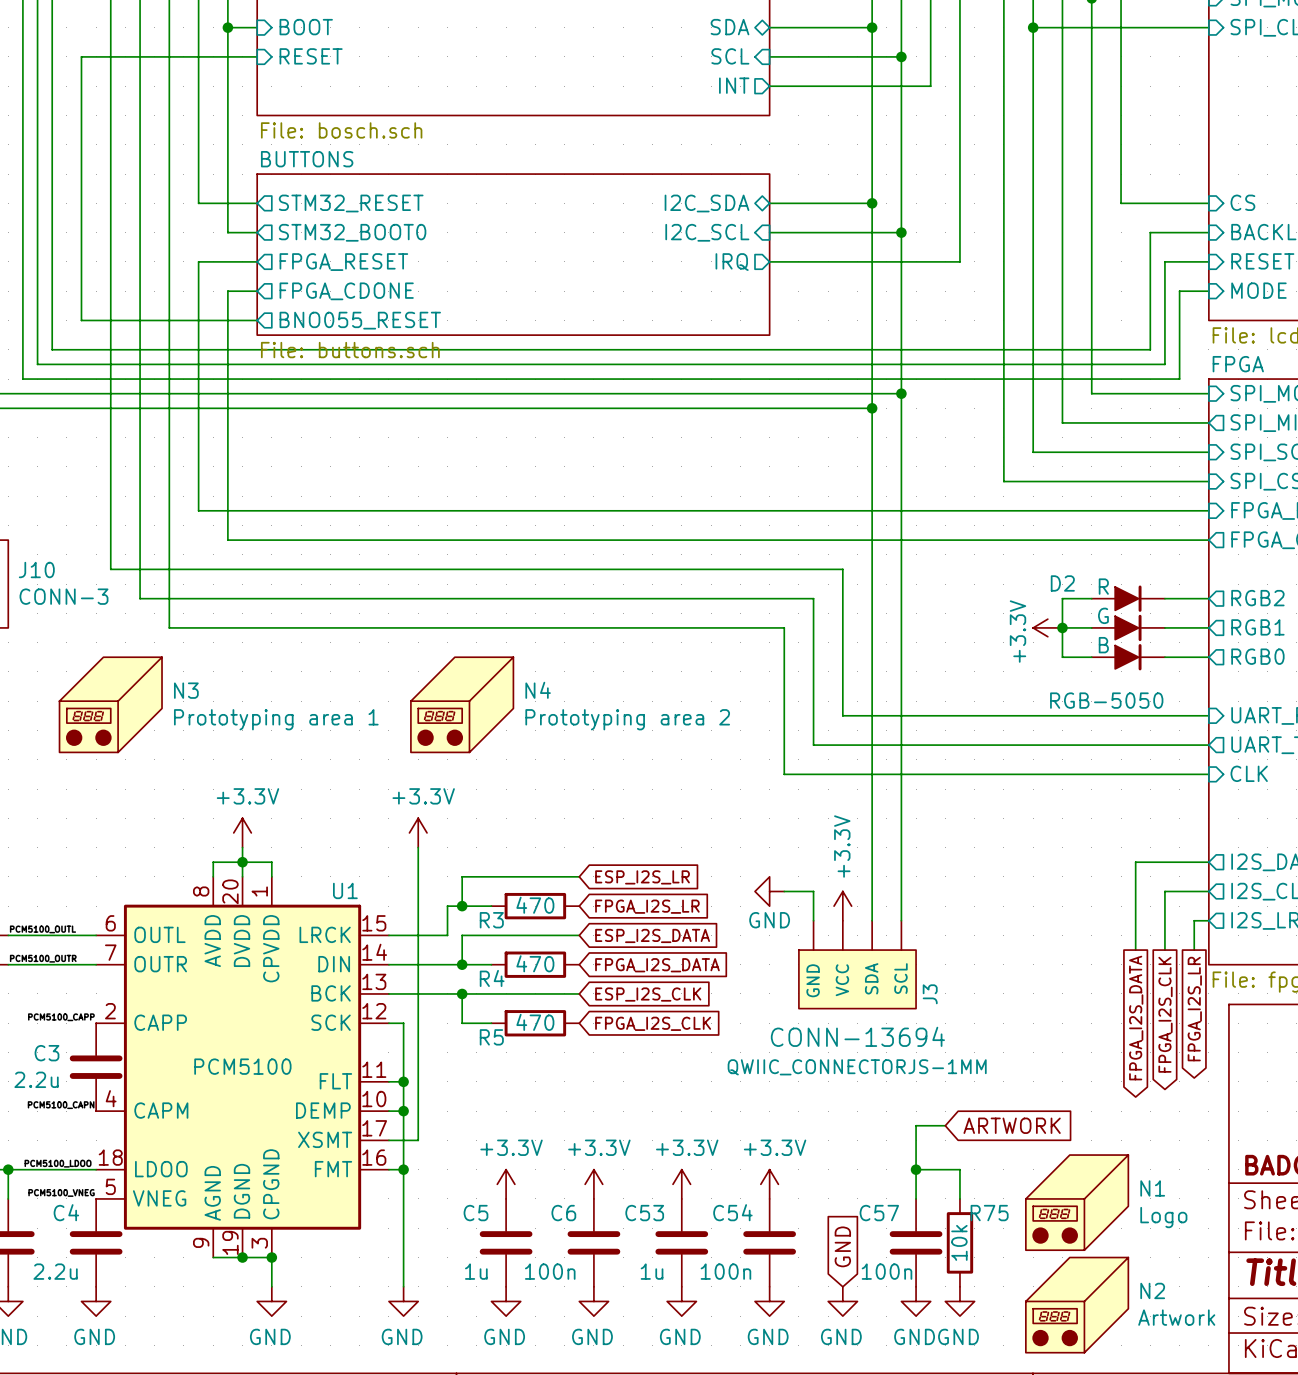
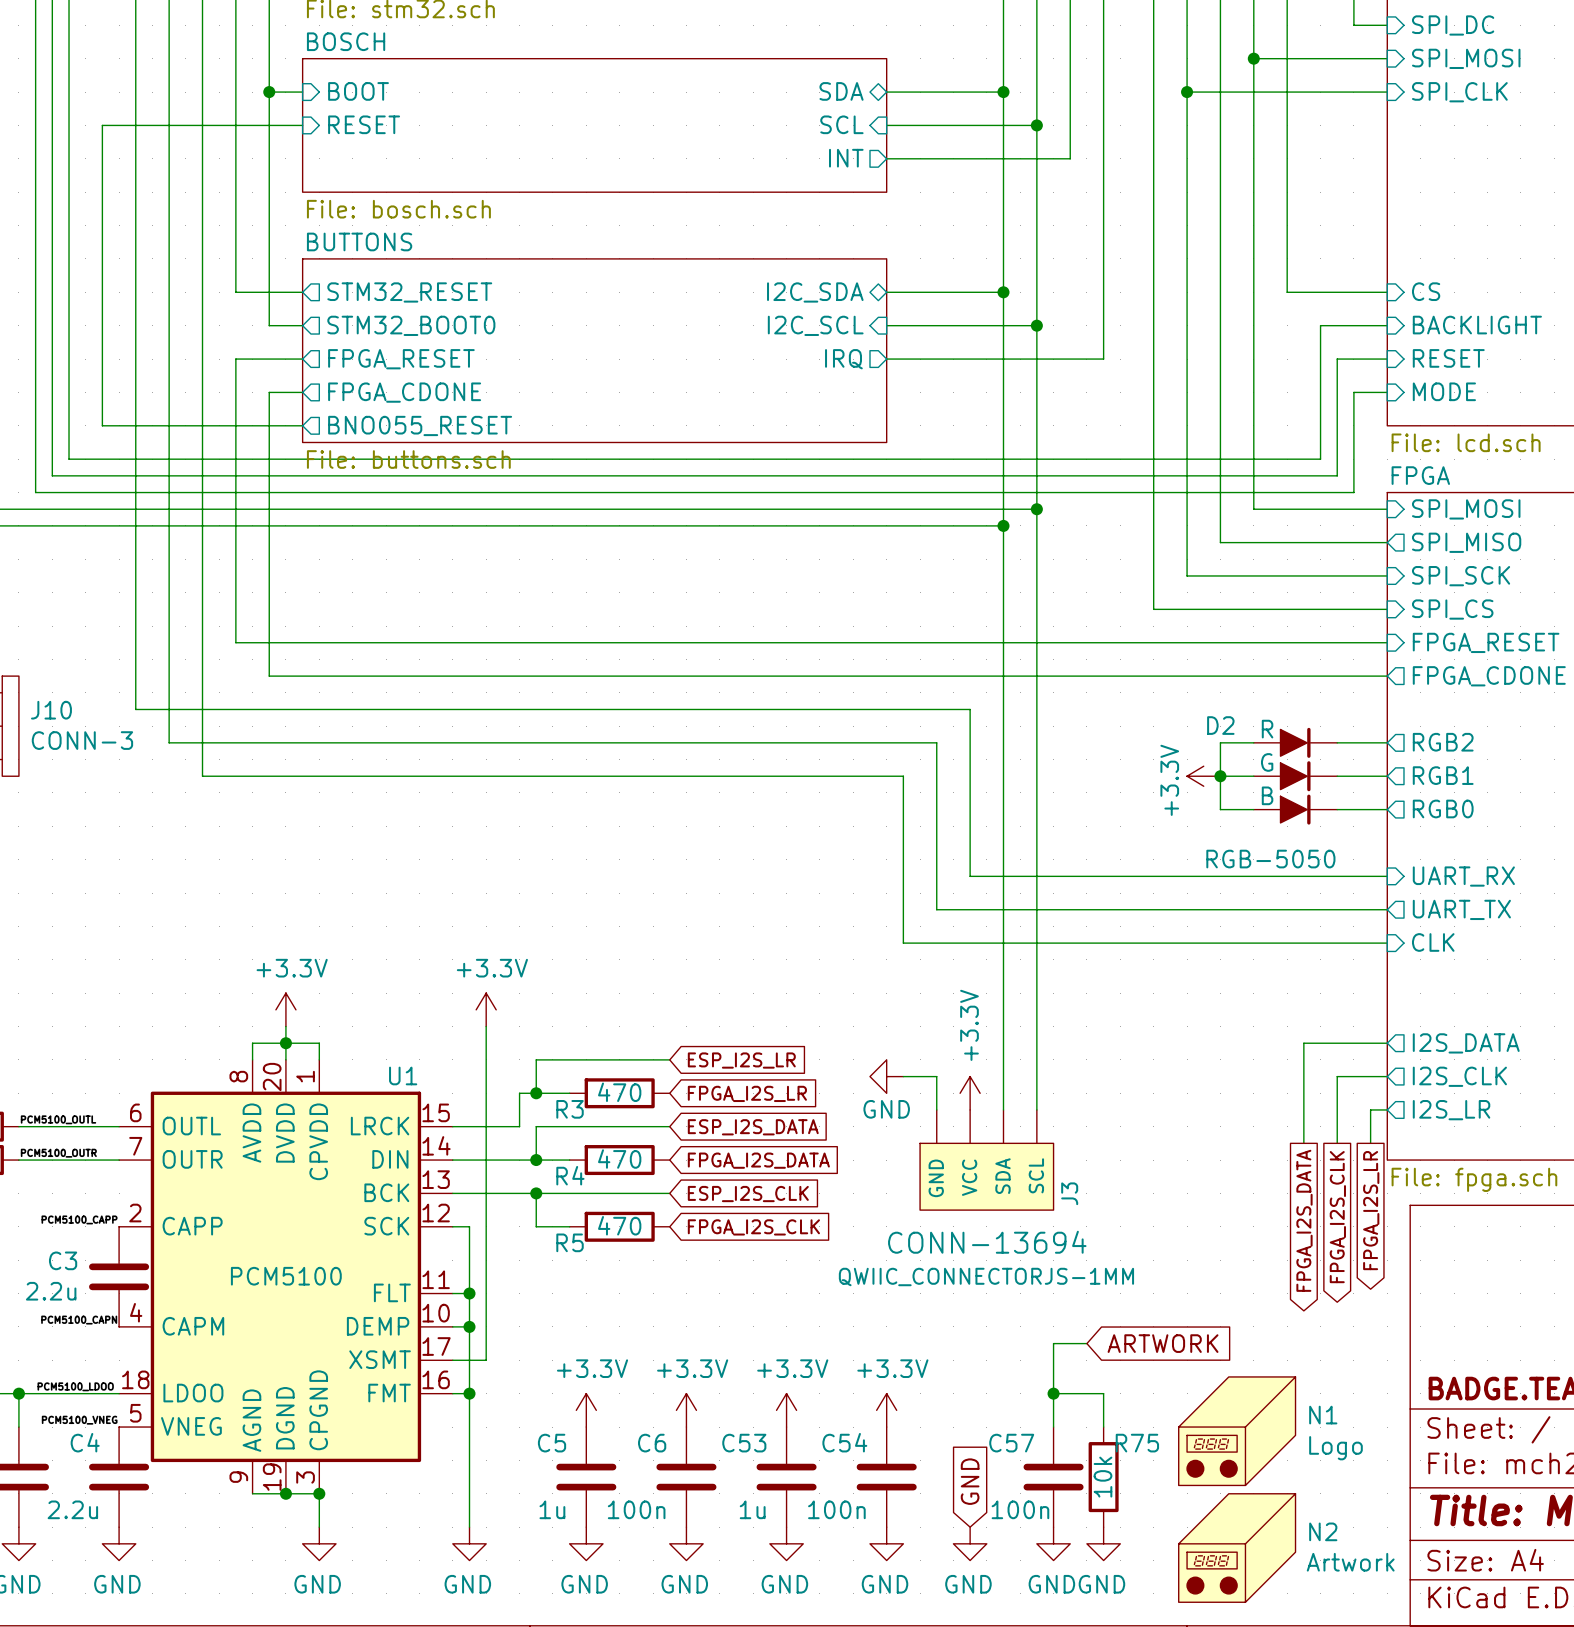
N3: Prototyping area 1 (110, 704) -> none
N4: Prototyping area 2 (462, 704) -> none

